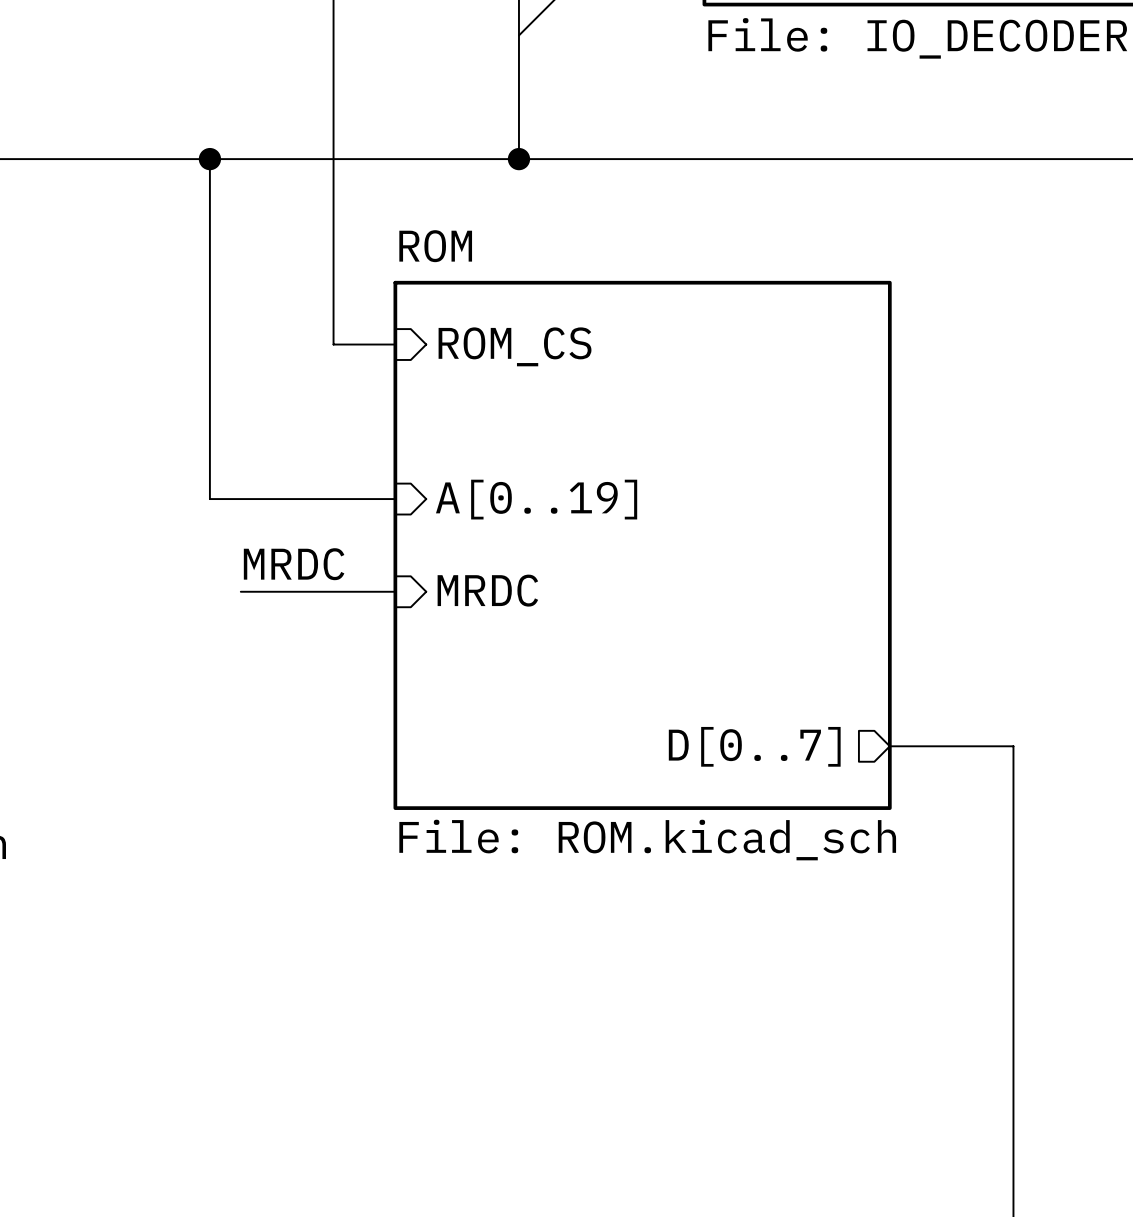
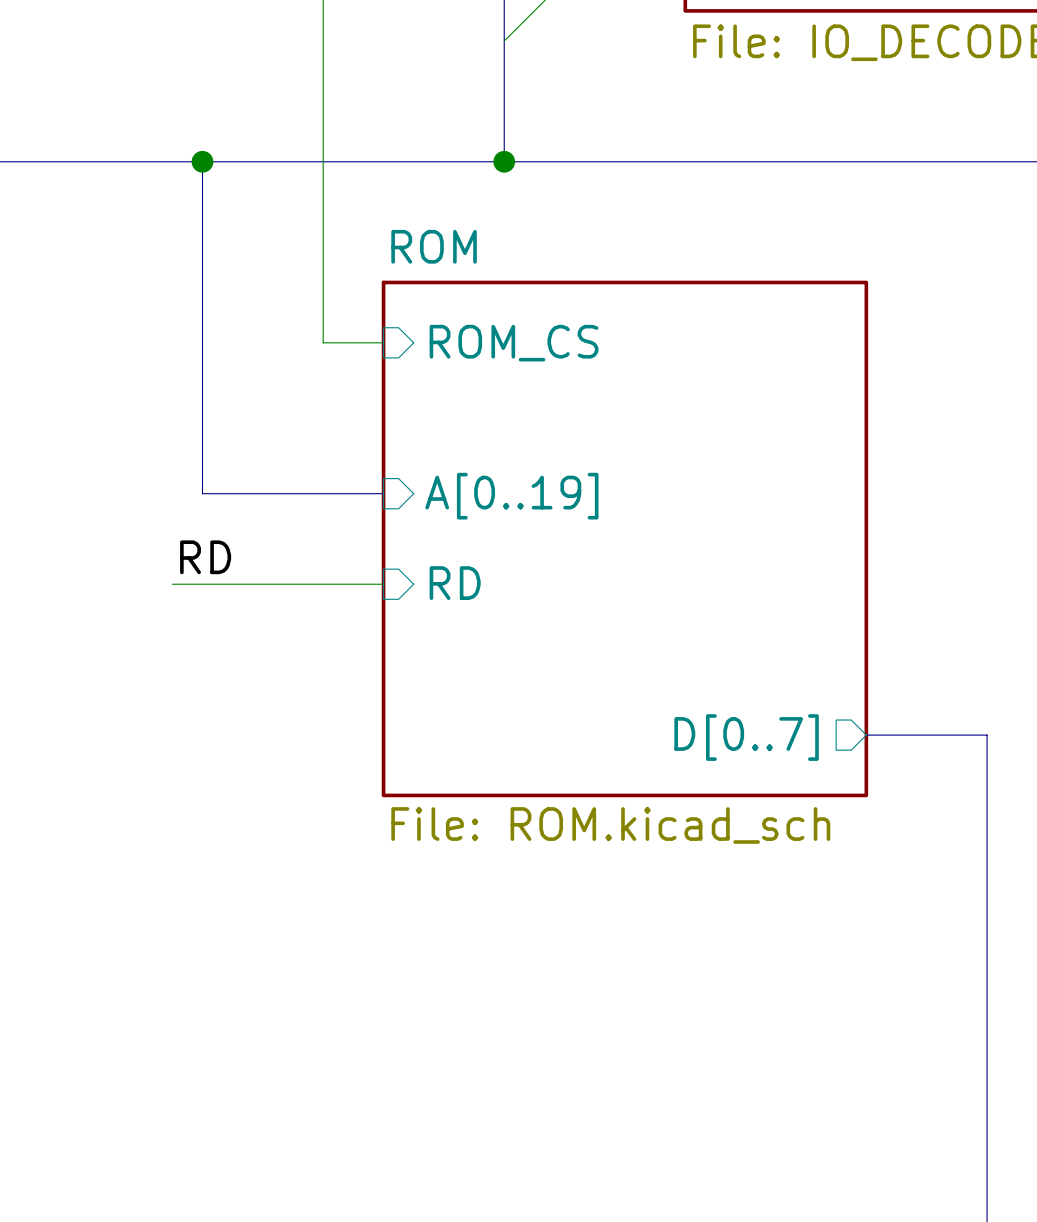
label: MRDC (294, 564) -> RD (205, 557)
sheet pin: MRDC (487, 590) -> RD (455, 583)
wire: none -> (172, 584) (232, 584)

